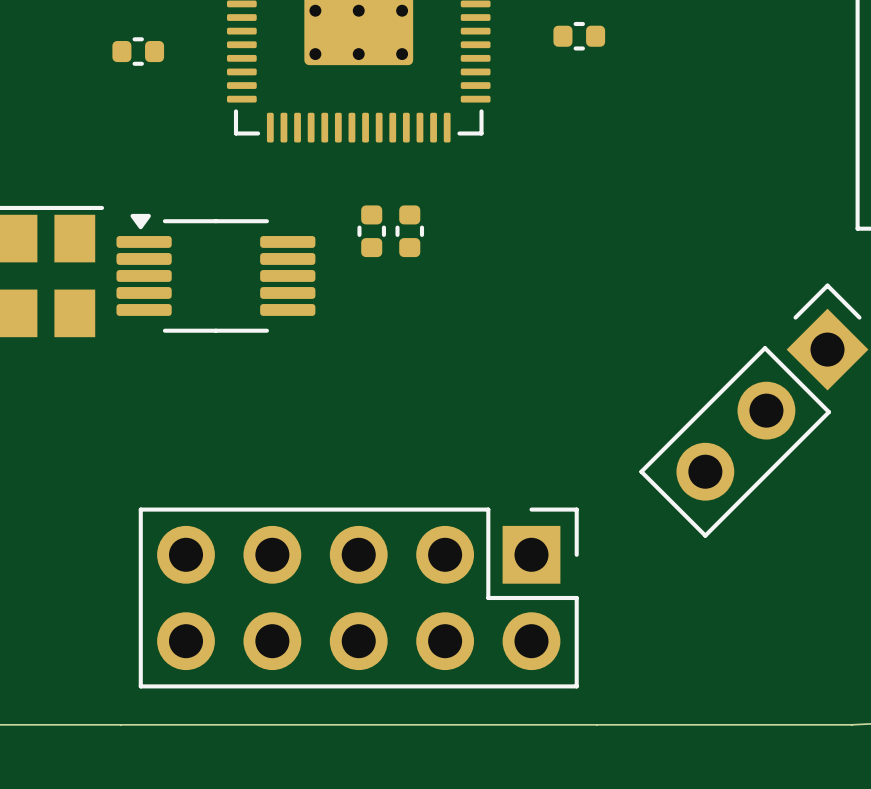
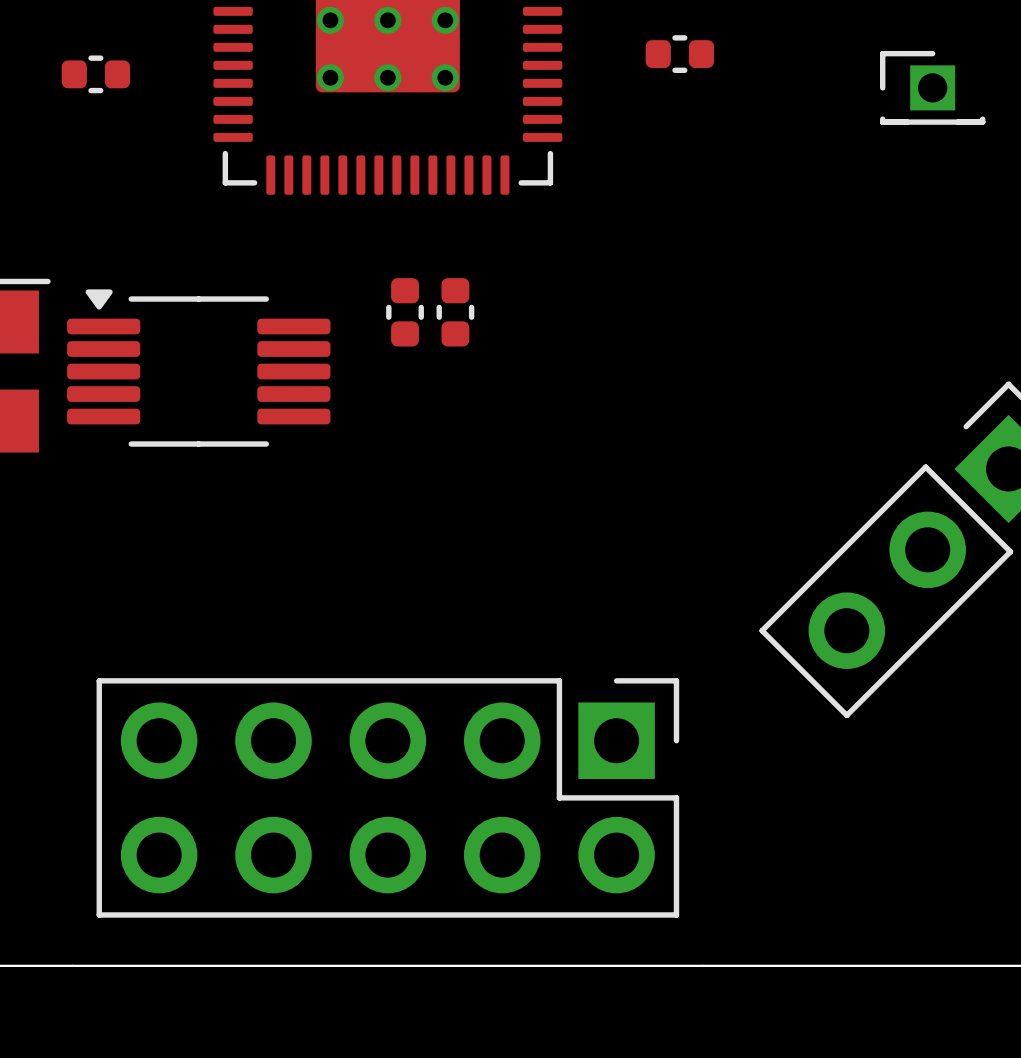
part: none -> (932, 87)

